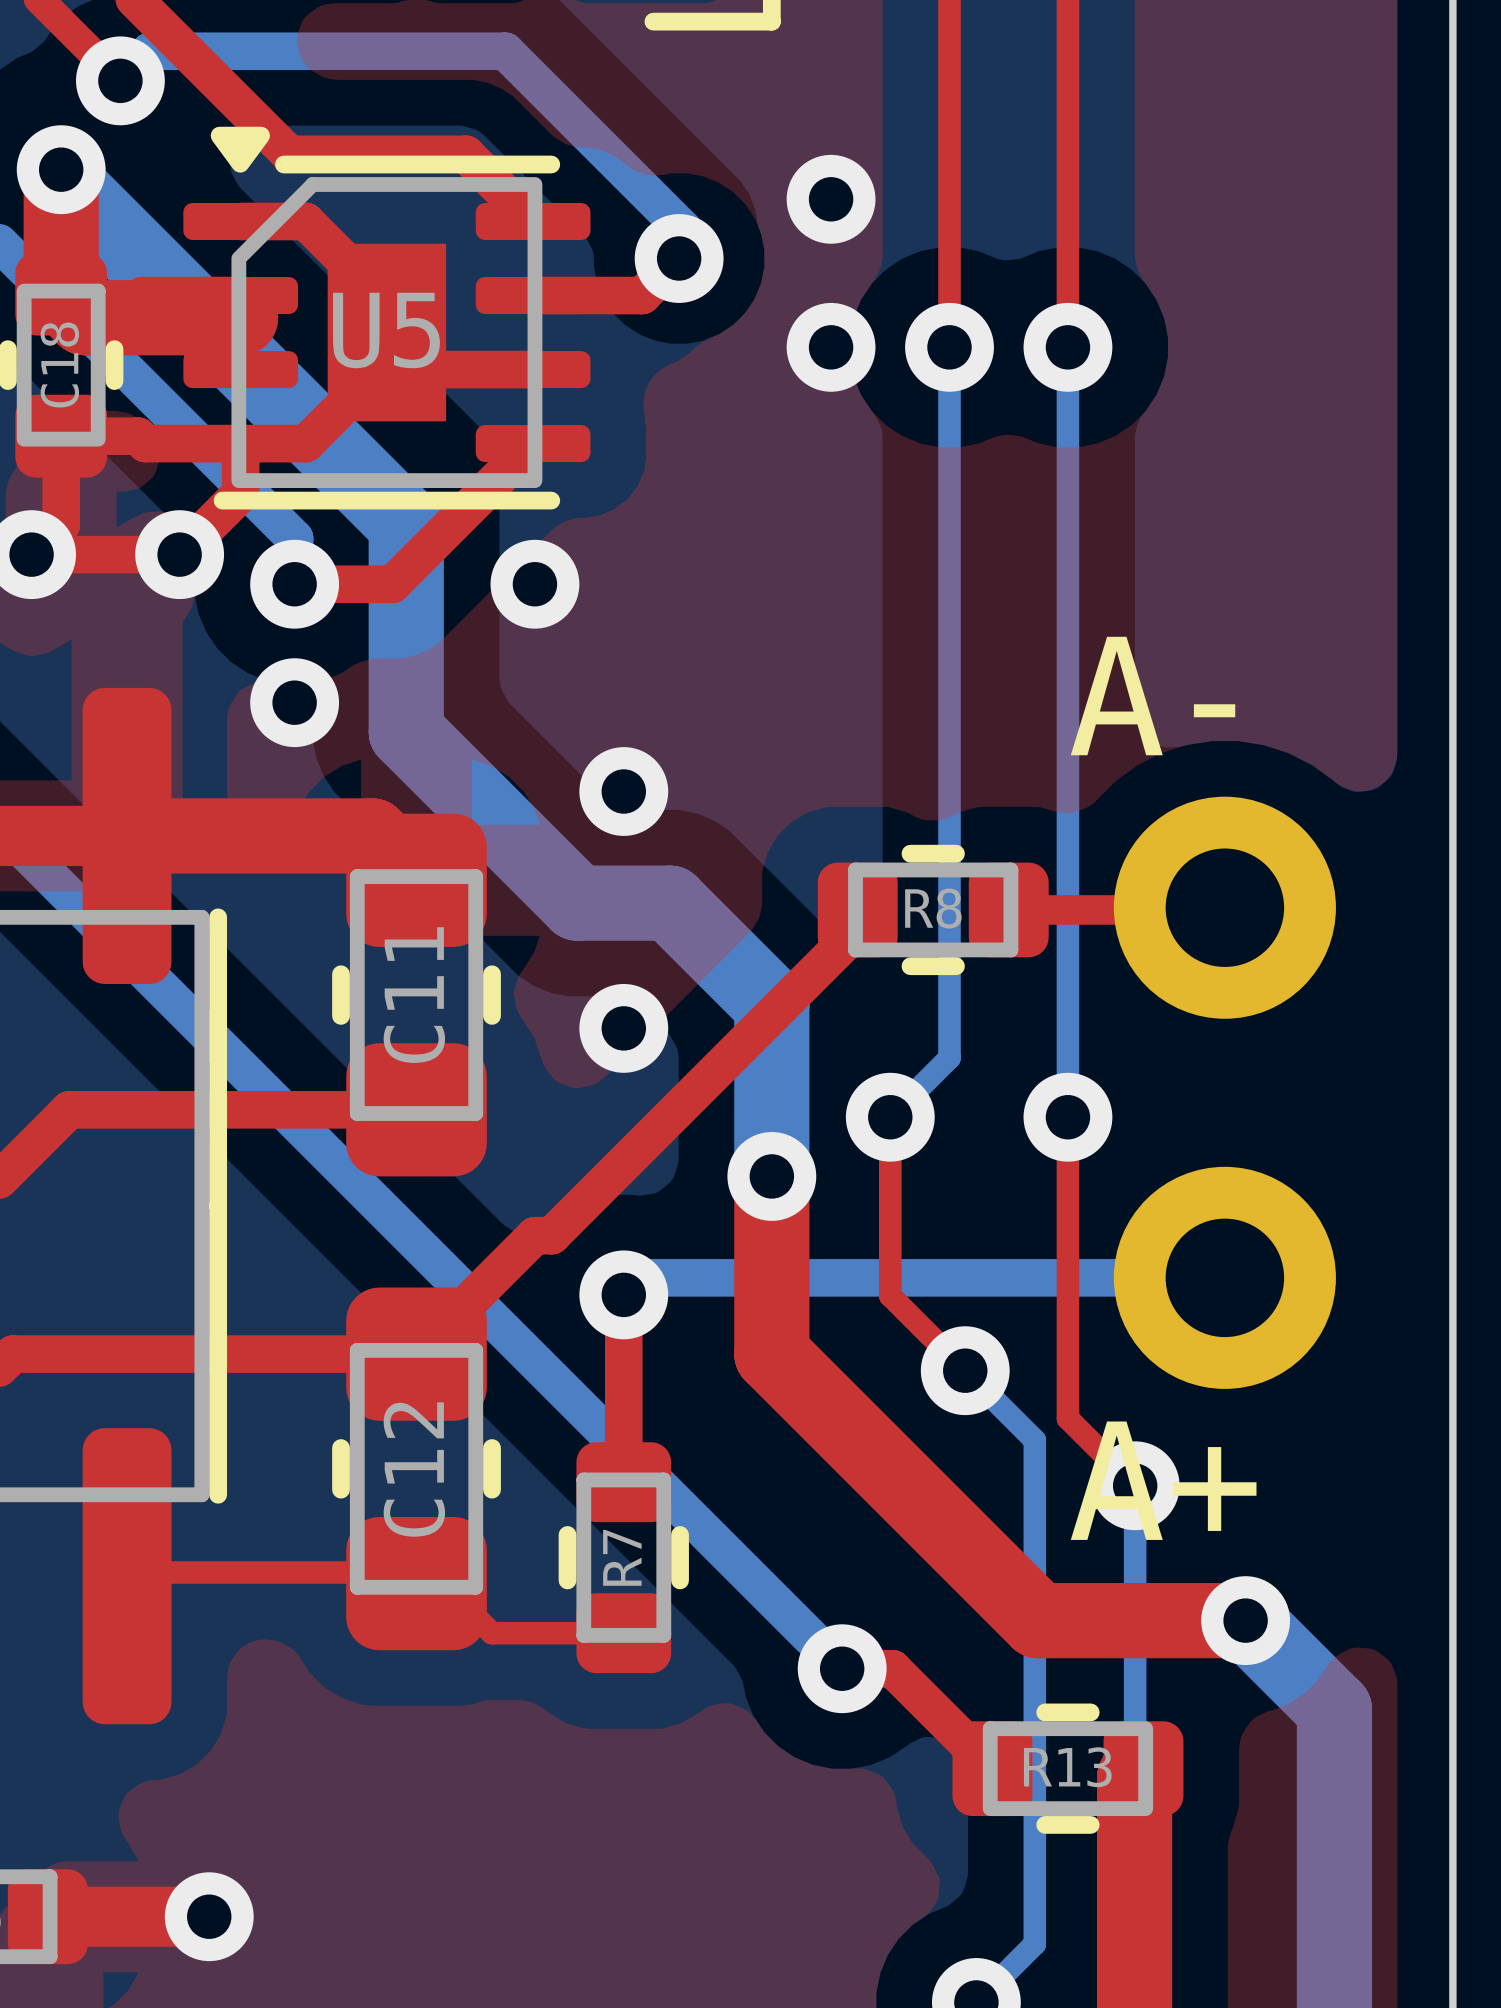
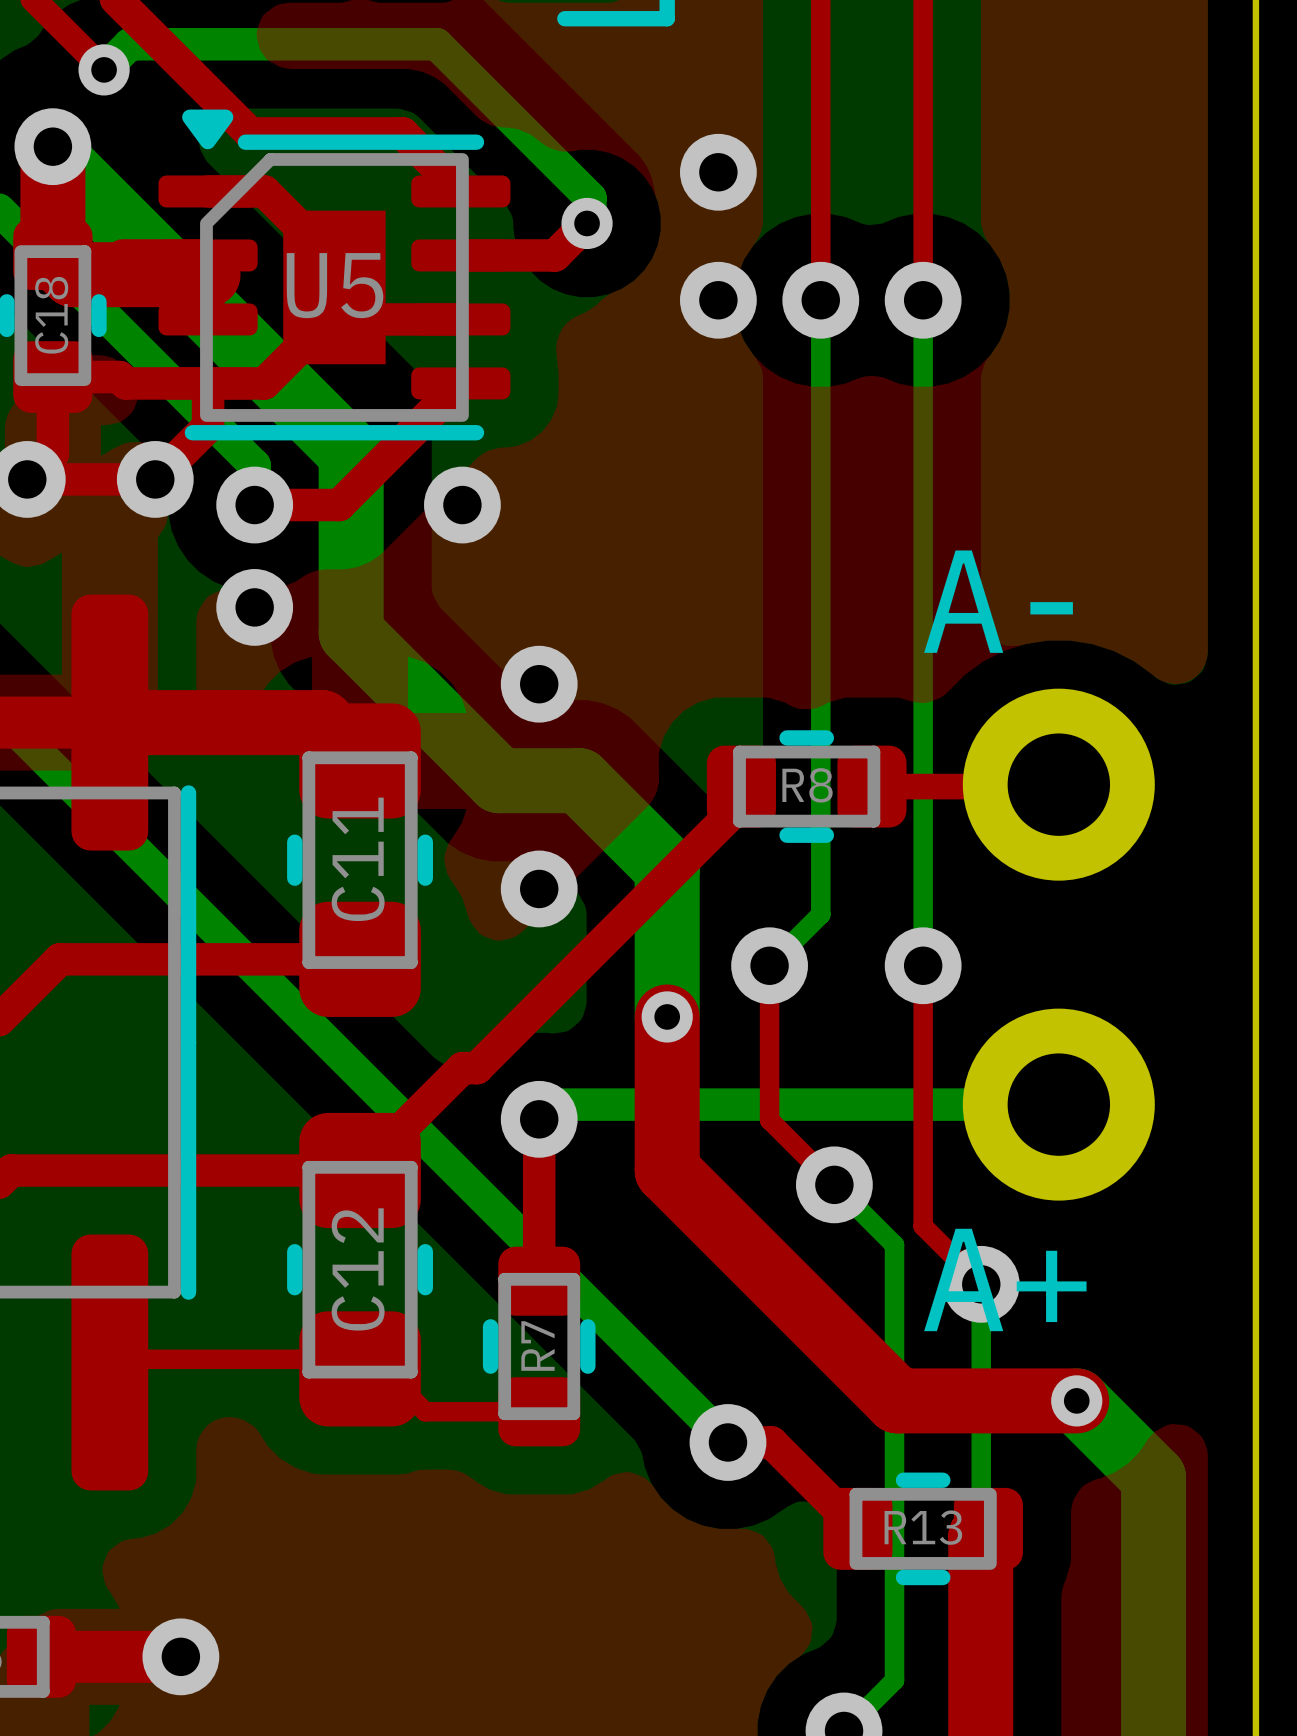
via size: [75, 36, 165, 126] -> [78, 44, 130, 96]
via size: [634, 214, 724, 303] -> [561, 197, 613, 250]
via size: [727, 1132, 817, 1221] -> [641, 991, 693, 1043]
via size: [1201, 1576, 1291, 1666] -> [1051, 1375, 1103, 1427]

